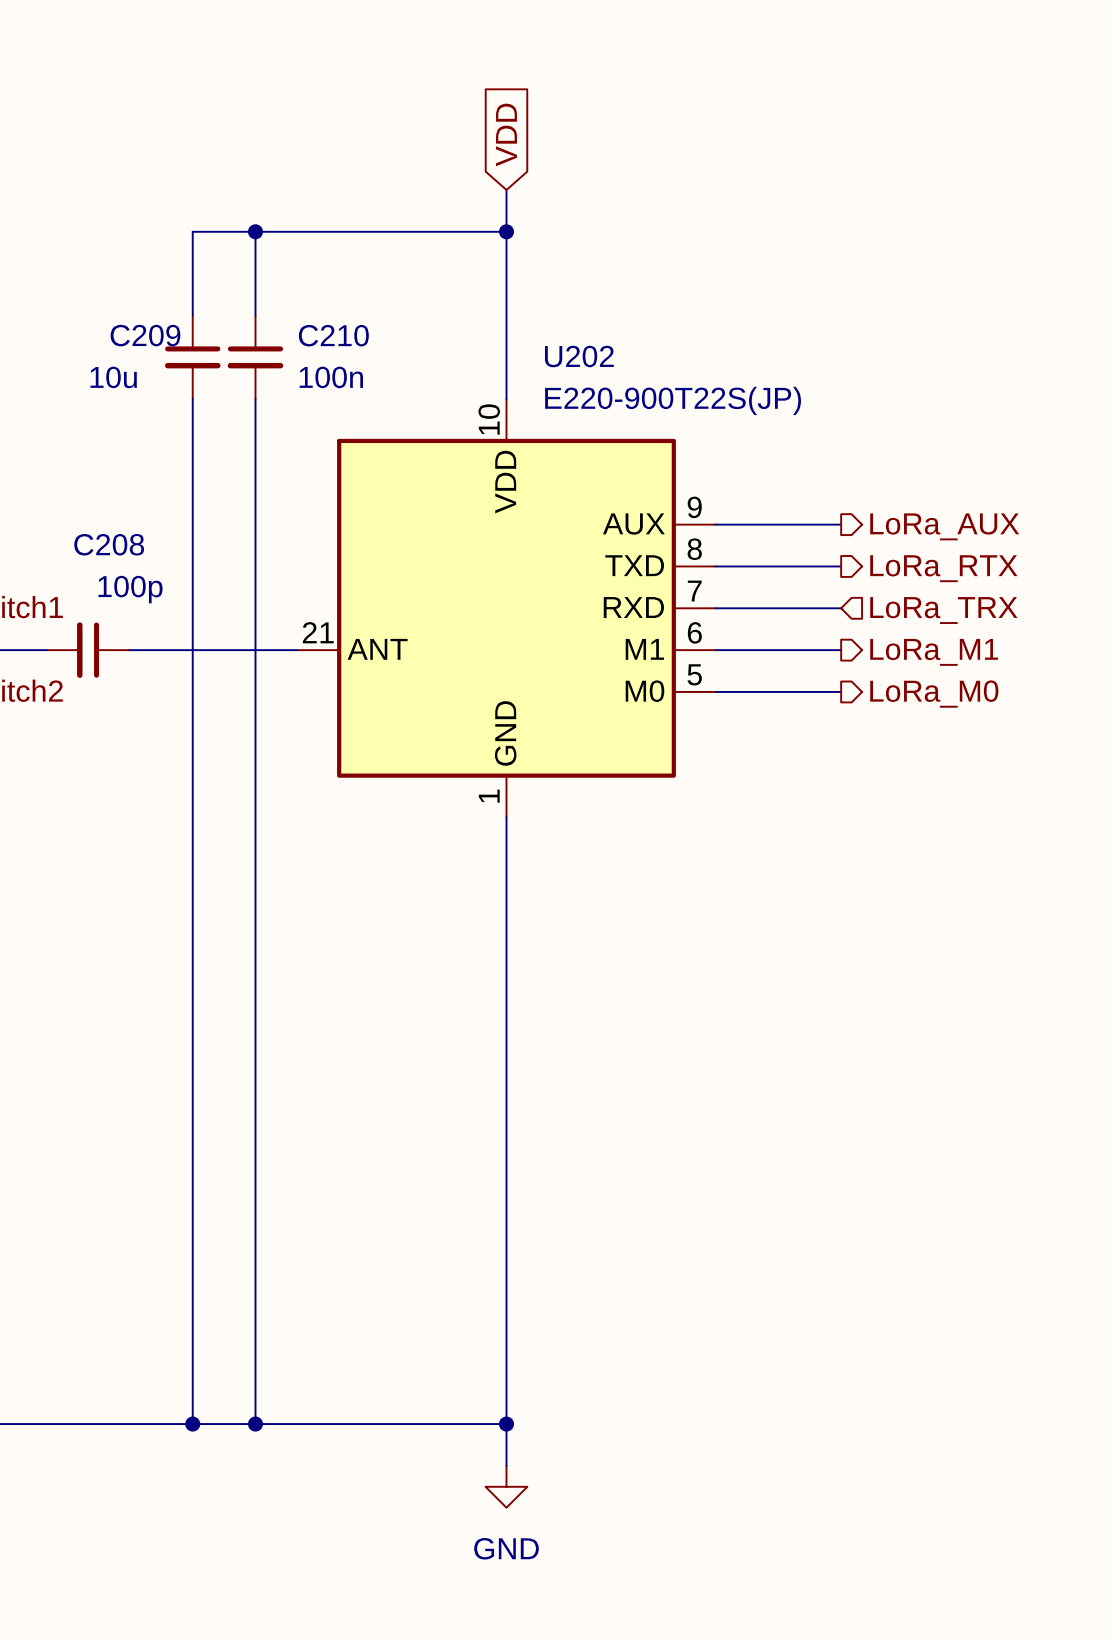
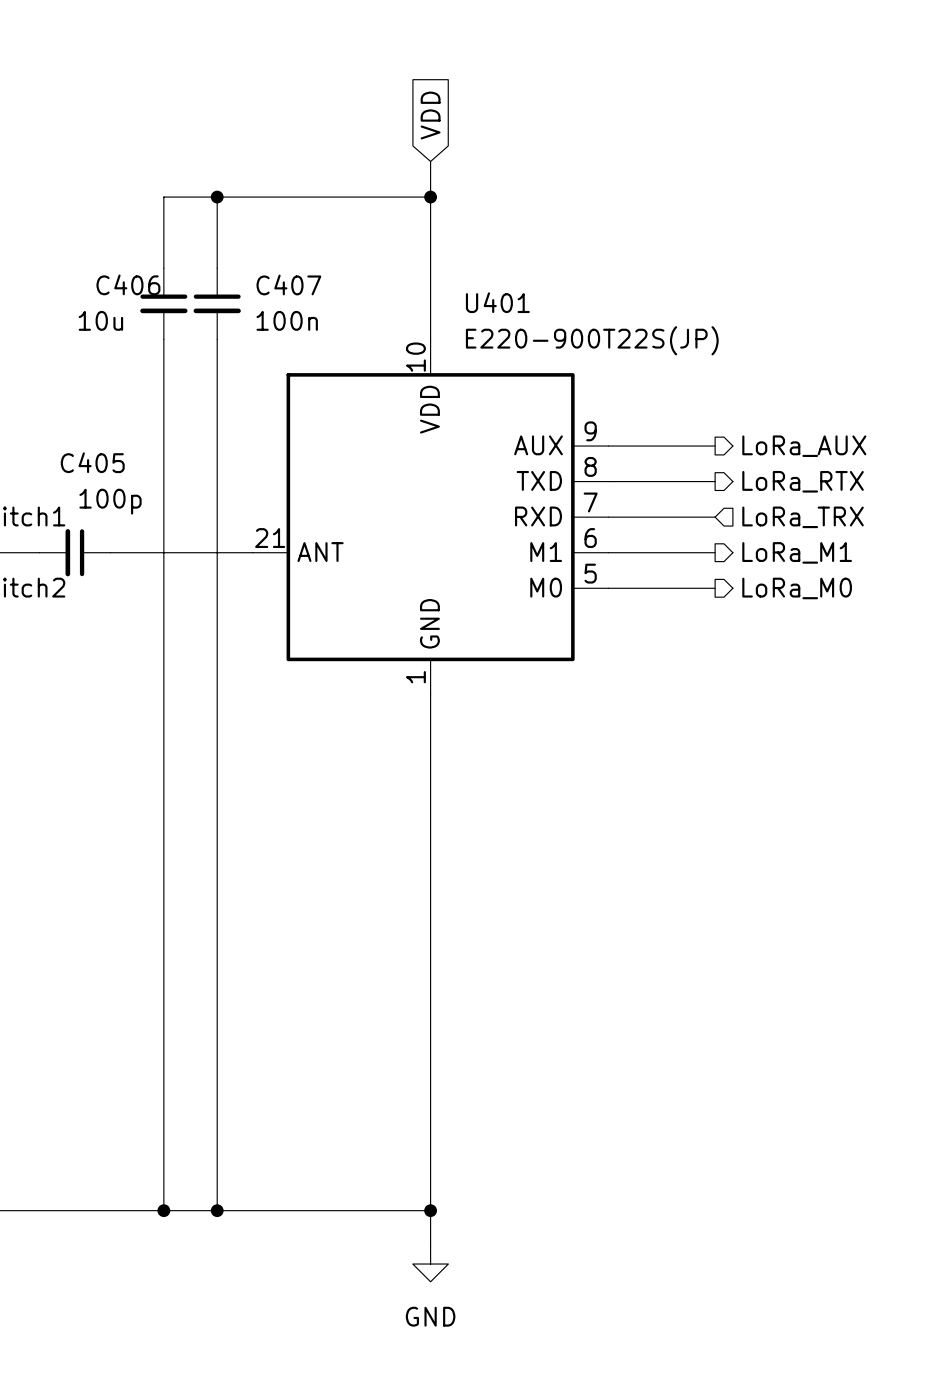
C209 name: C209 (145, 335) -> C406 (128, 284)
C210 name: C210 (333, 335) -> C407 (288, 284)
U202 name: U202 (579, 356) -> U401 (497, 302)
C208 name: C208 (109, 544) -> C405 (92, 462)

